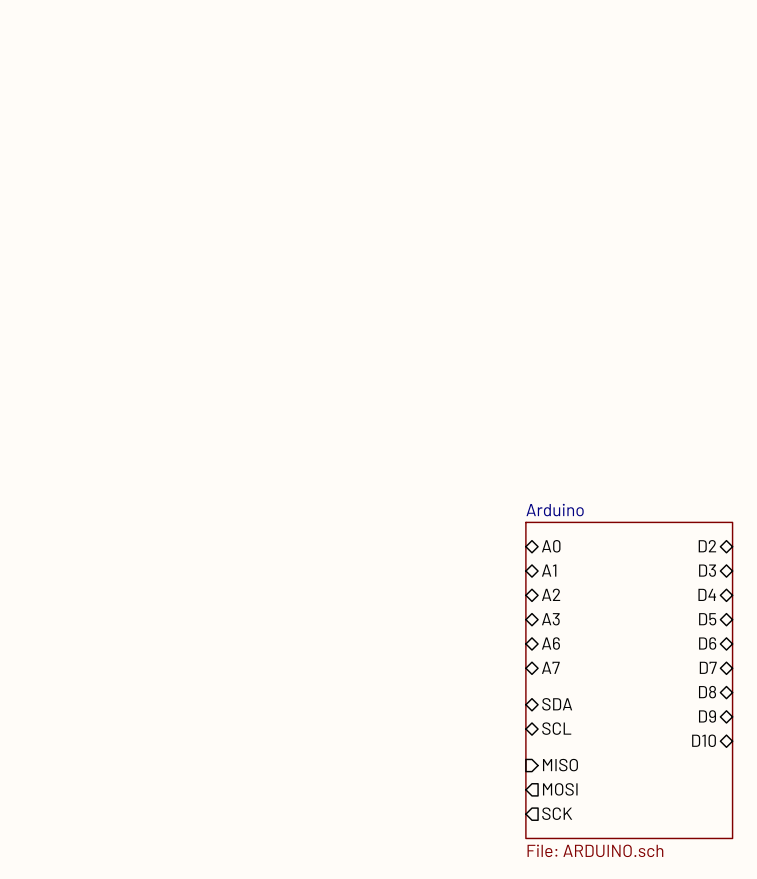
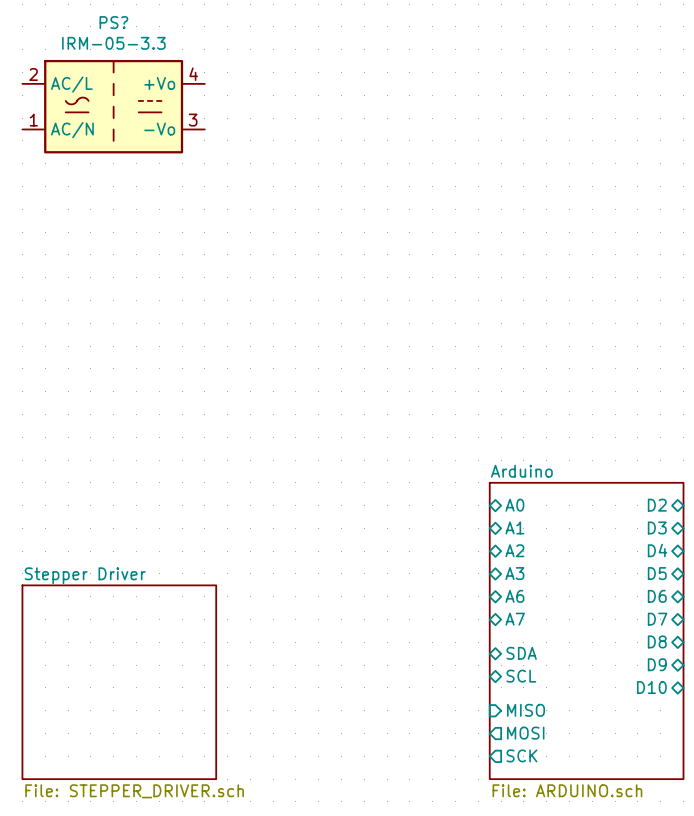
PS?: none -> IRM-05-3.3 (113, 106)
sheet Stepper Driver: none -> File: STEPPER_DRIVER.sch (119, 682)

